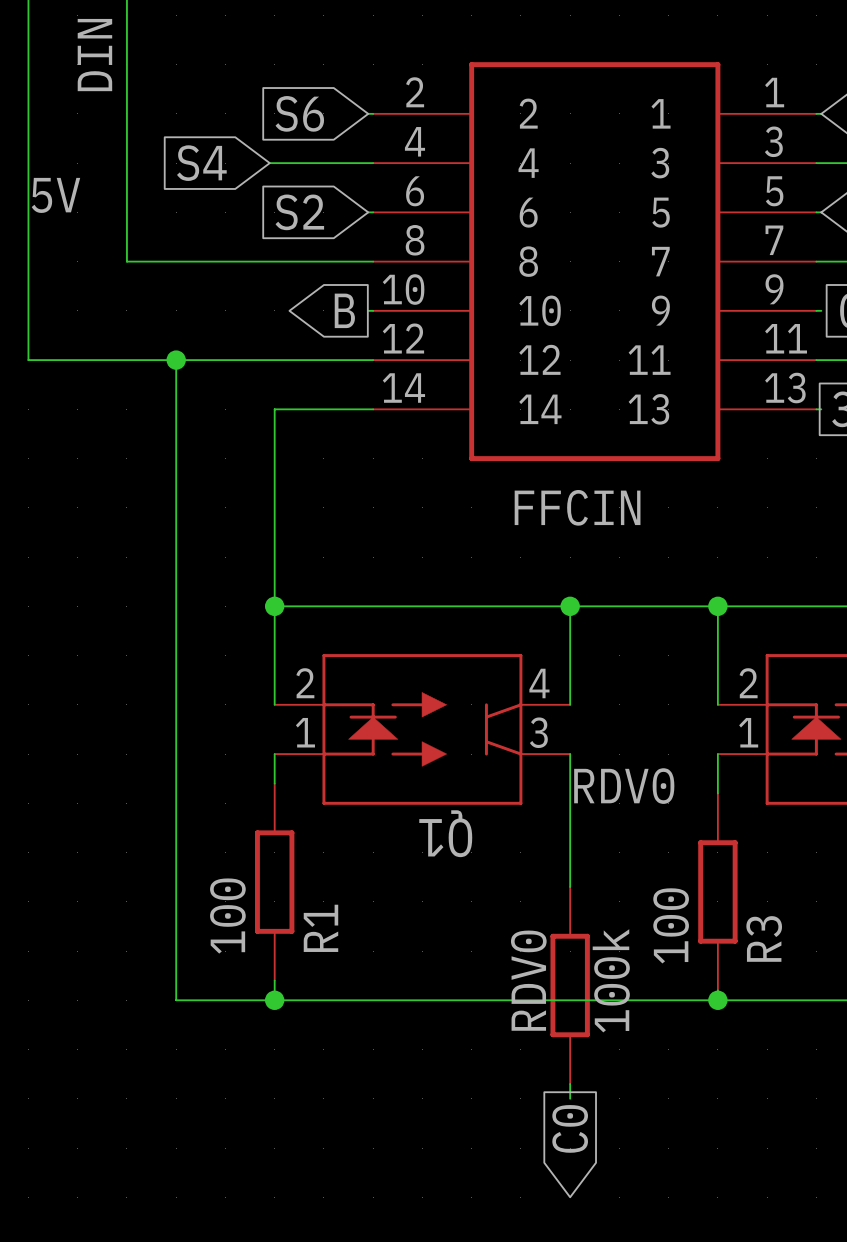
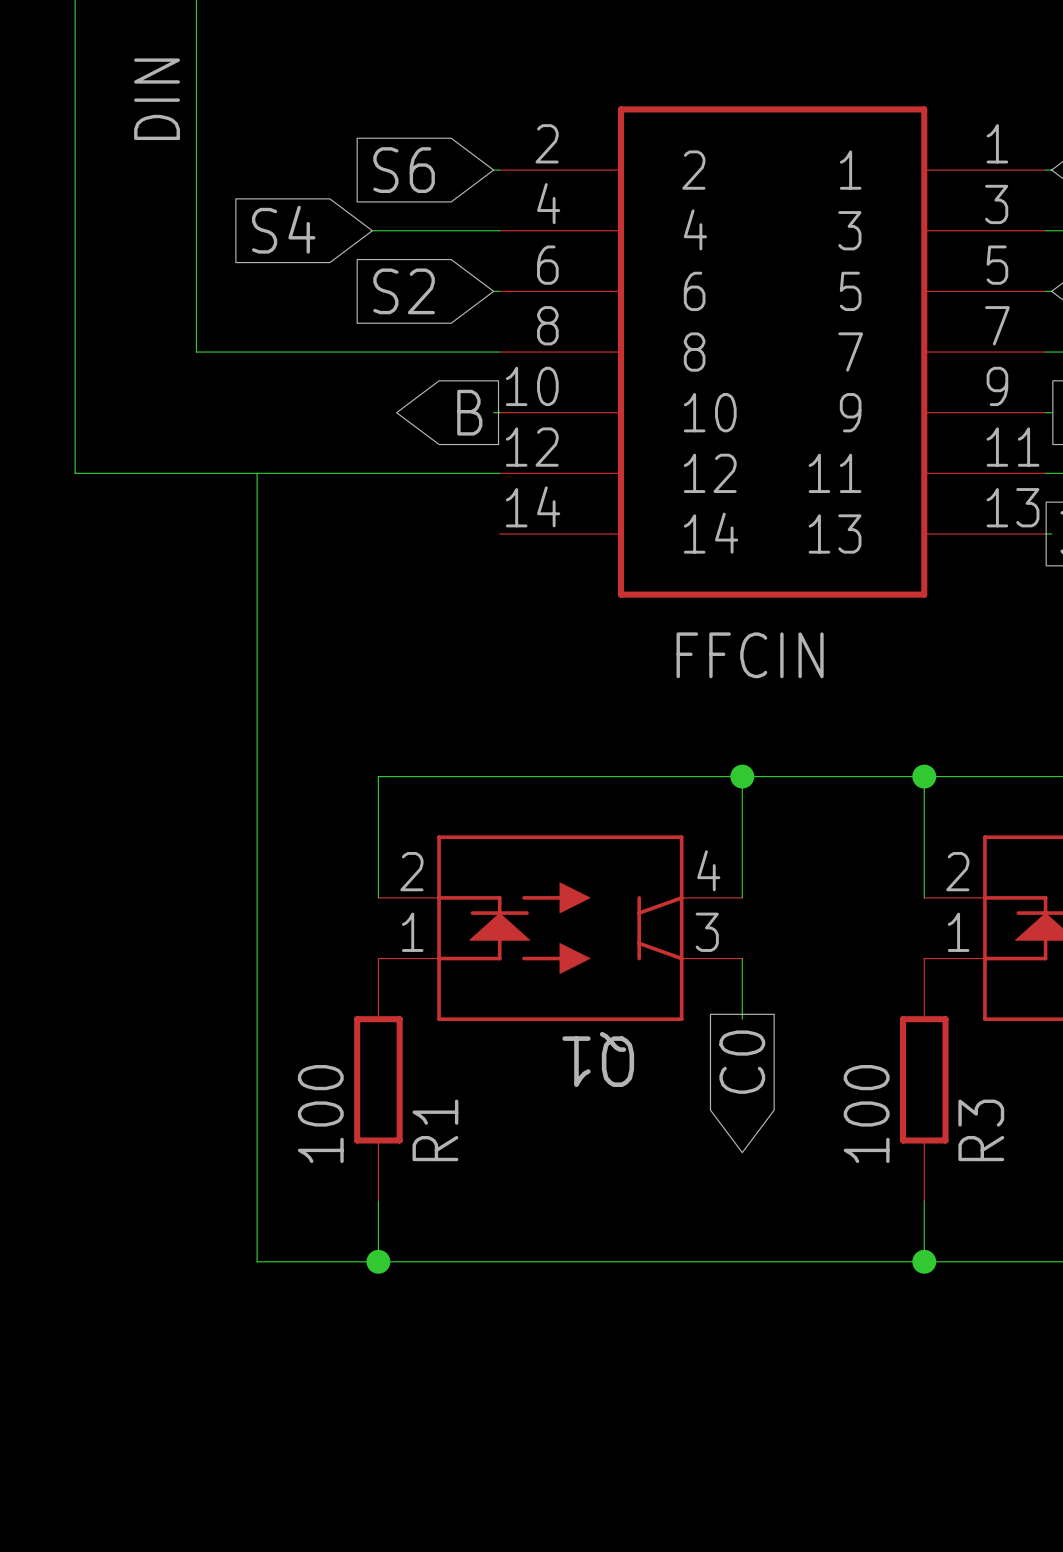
label: 5V (55, 195) -> none
junction: (176, 360) -> none
wire: (373, 409) (274, 409) (274, 606) -> none
junction: (274, 606) -> none
label: RDV0 (624, 786) -> none
wire: (570, 803) (570, 887) -> none
R1 position: (274, 882) -> (378, 1079)
R3 position: (717, 891) -> (924, 1079)
RDV0: 100k (570, 985) -> none
wire: (570, 1084) (570, 1098) -> none
global label position: C0 (570, 1128) -> C0 (742, 1062)

